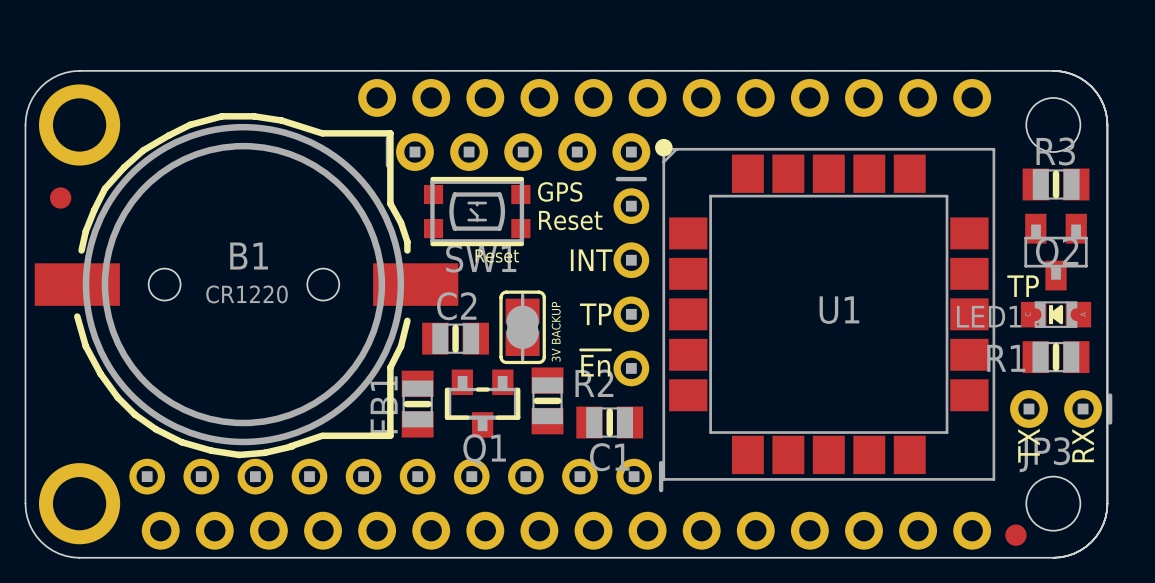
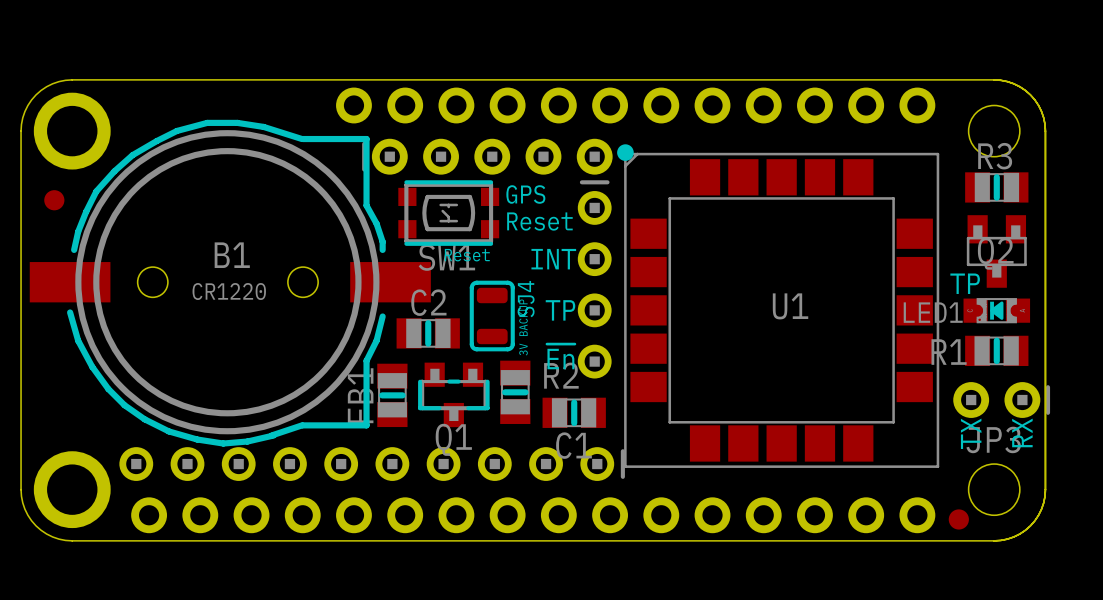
SJ4: none -> (492, 316)
part: (522, 327) -> none

